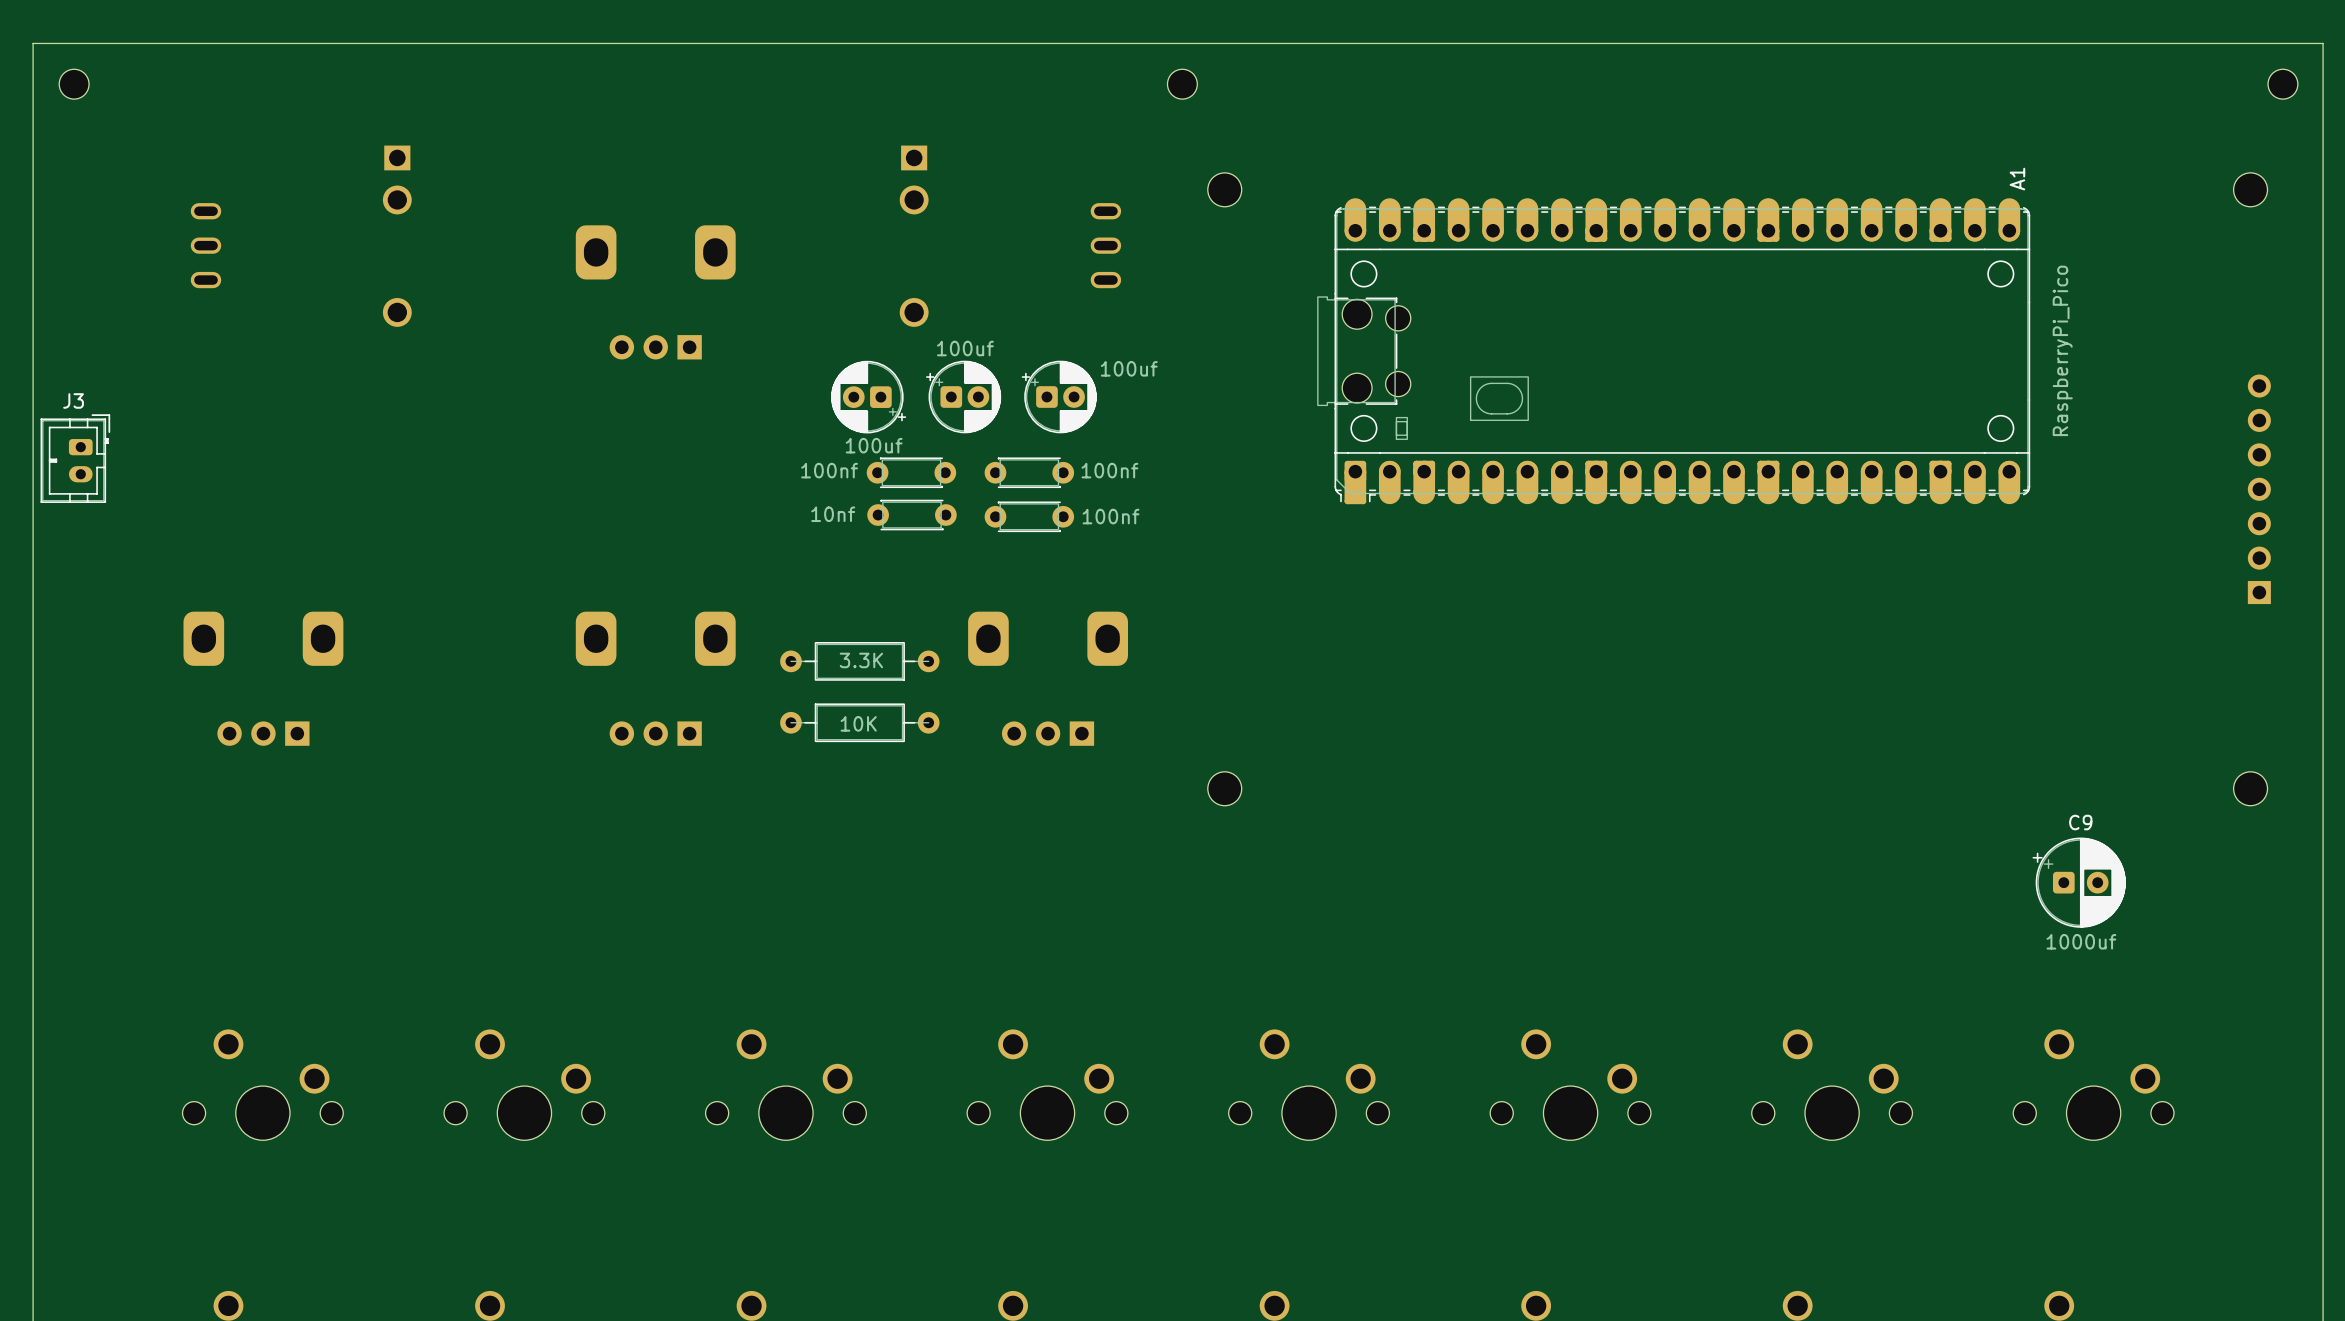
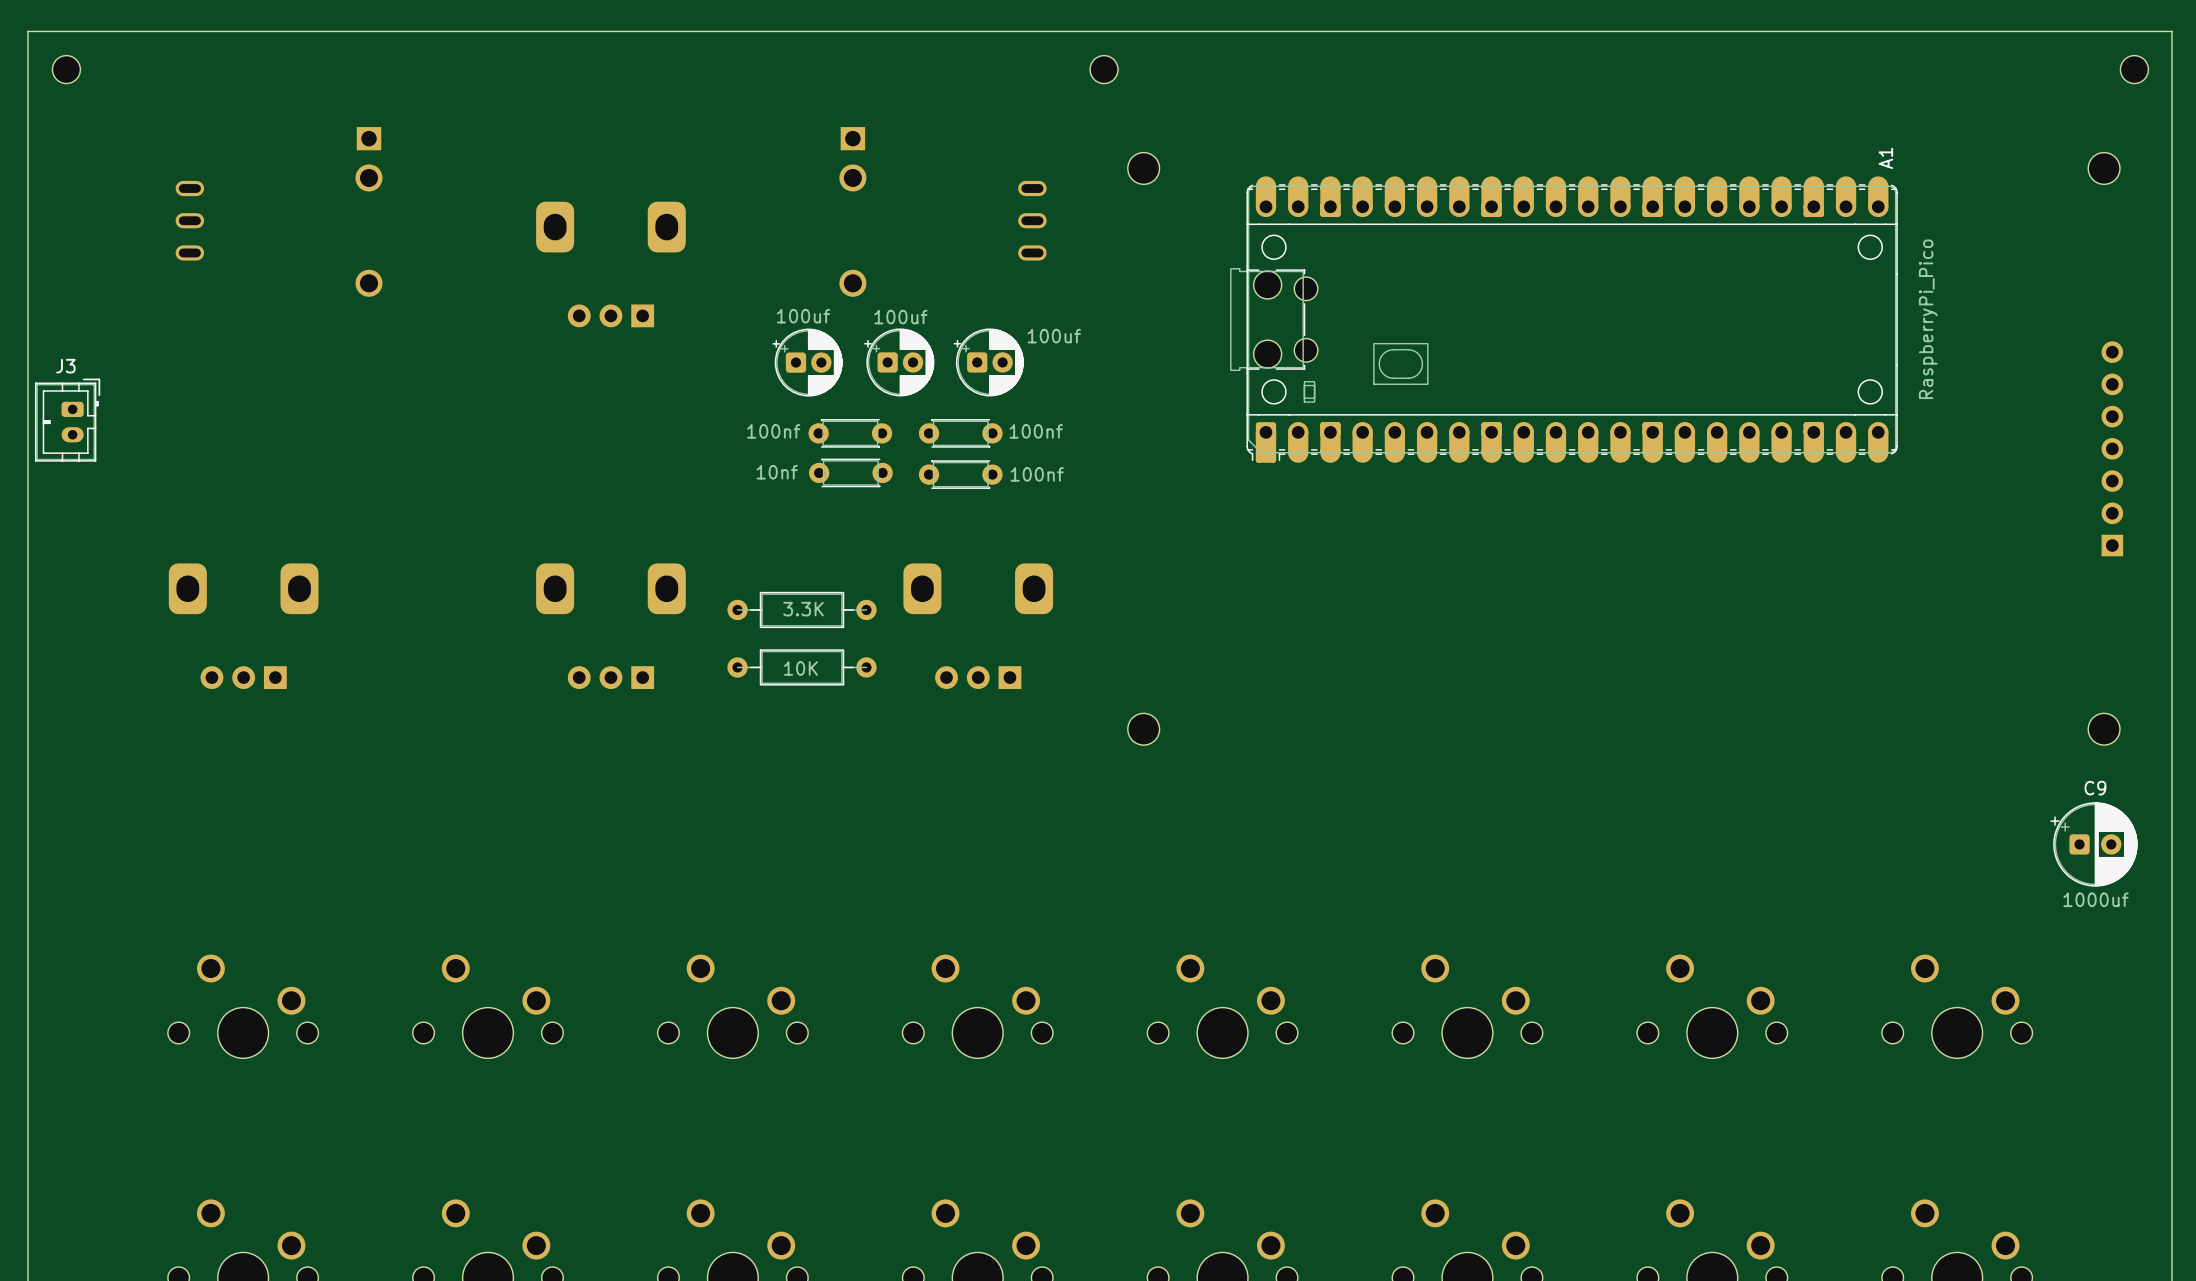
part rotation: 0° (868, 397) -> 180° (807, 362)
C9 position: (2079, 882) -> (2093, 844)

